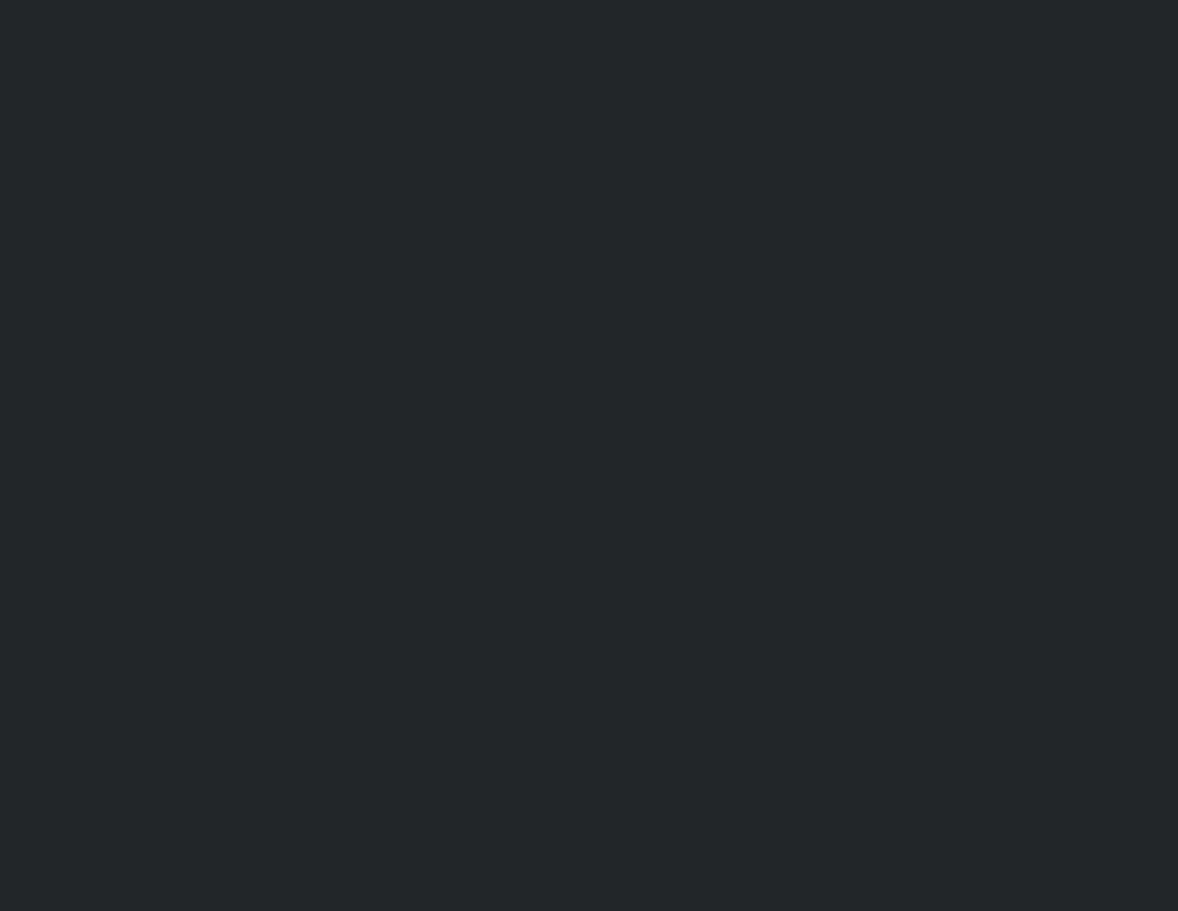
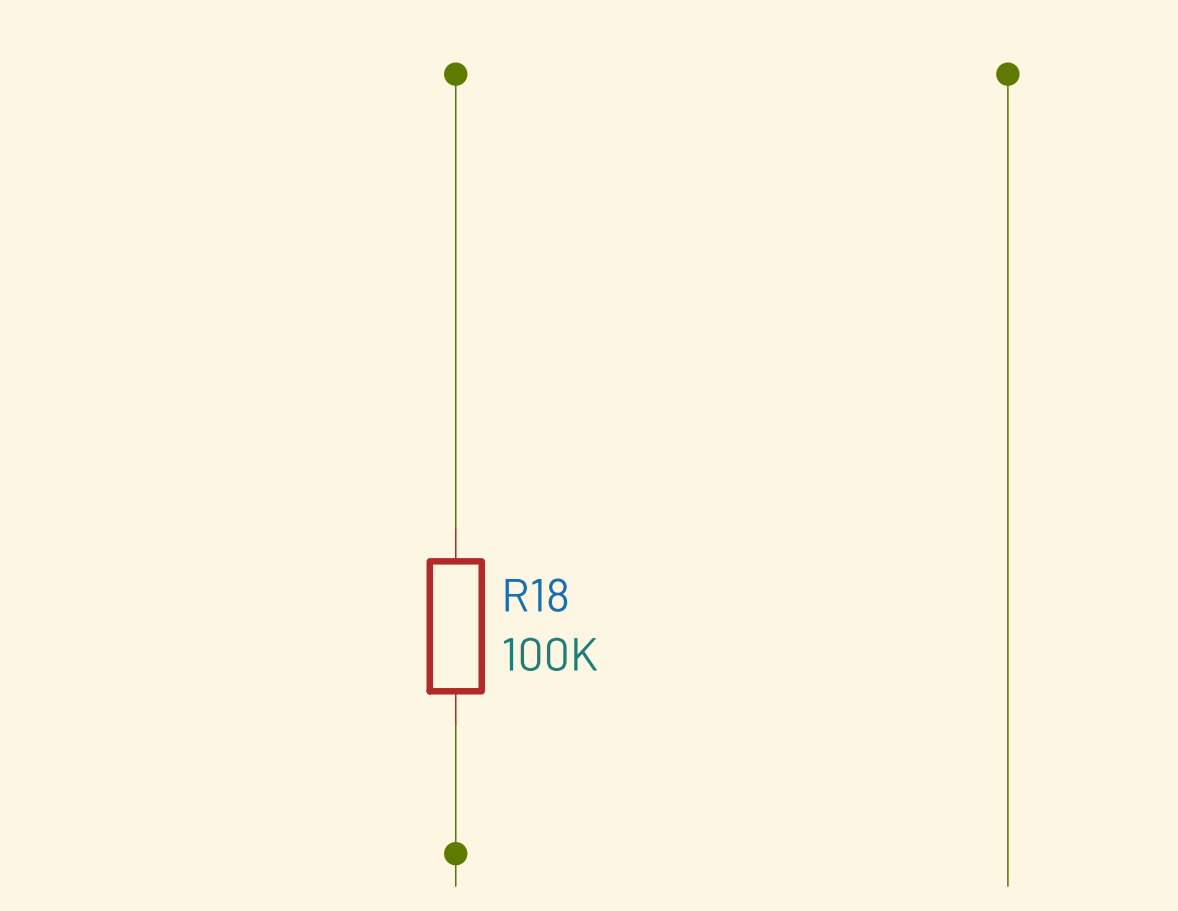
wire: none -> (455, 74) (455, 528)
junction: none -> (455, 74)
wire: none -> (1007, 74) (1007, 886)
junction: none -> (1007, 74)
R18: none -> 100K (455, 626)
wire: none -> (455, 723) (455, 886)
junction: none -> (455, 853)

